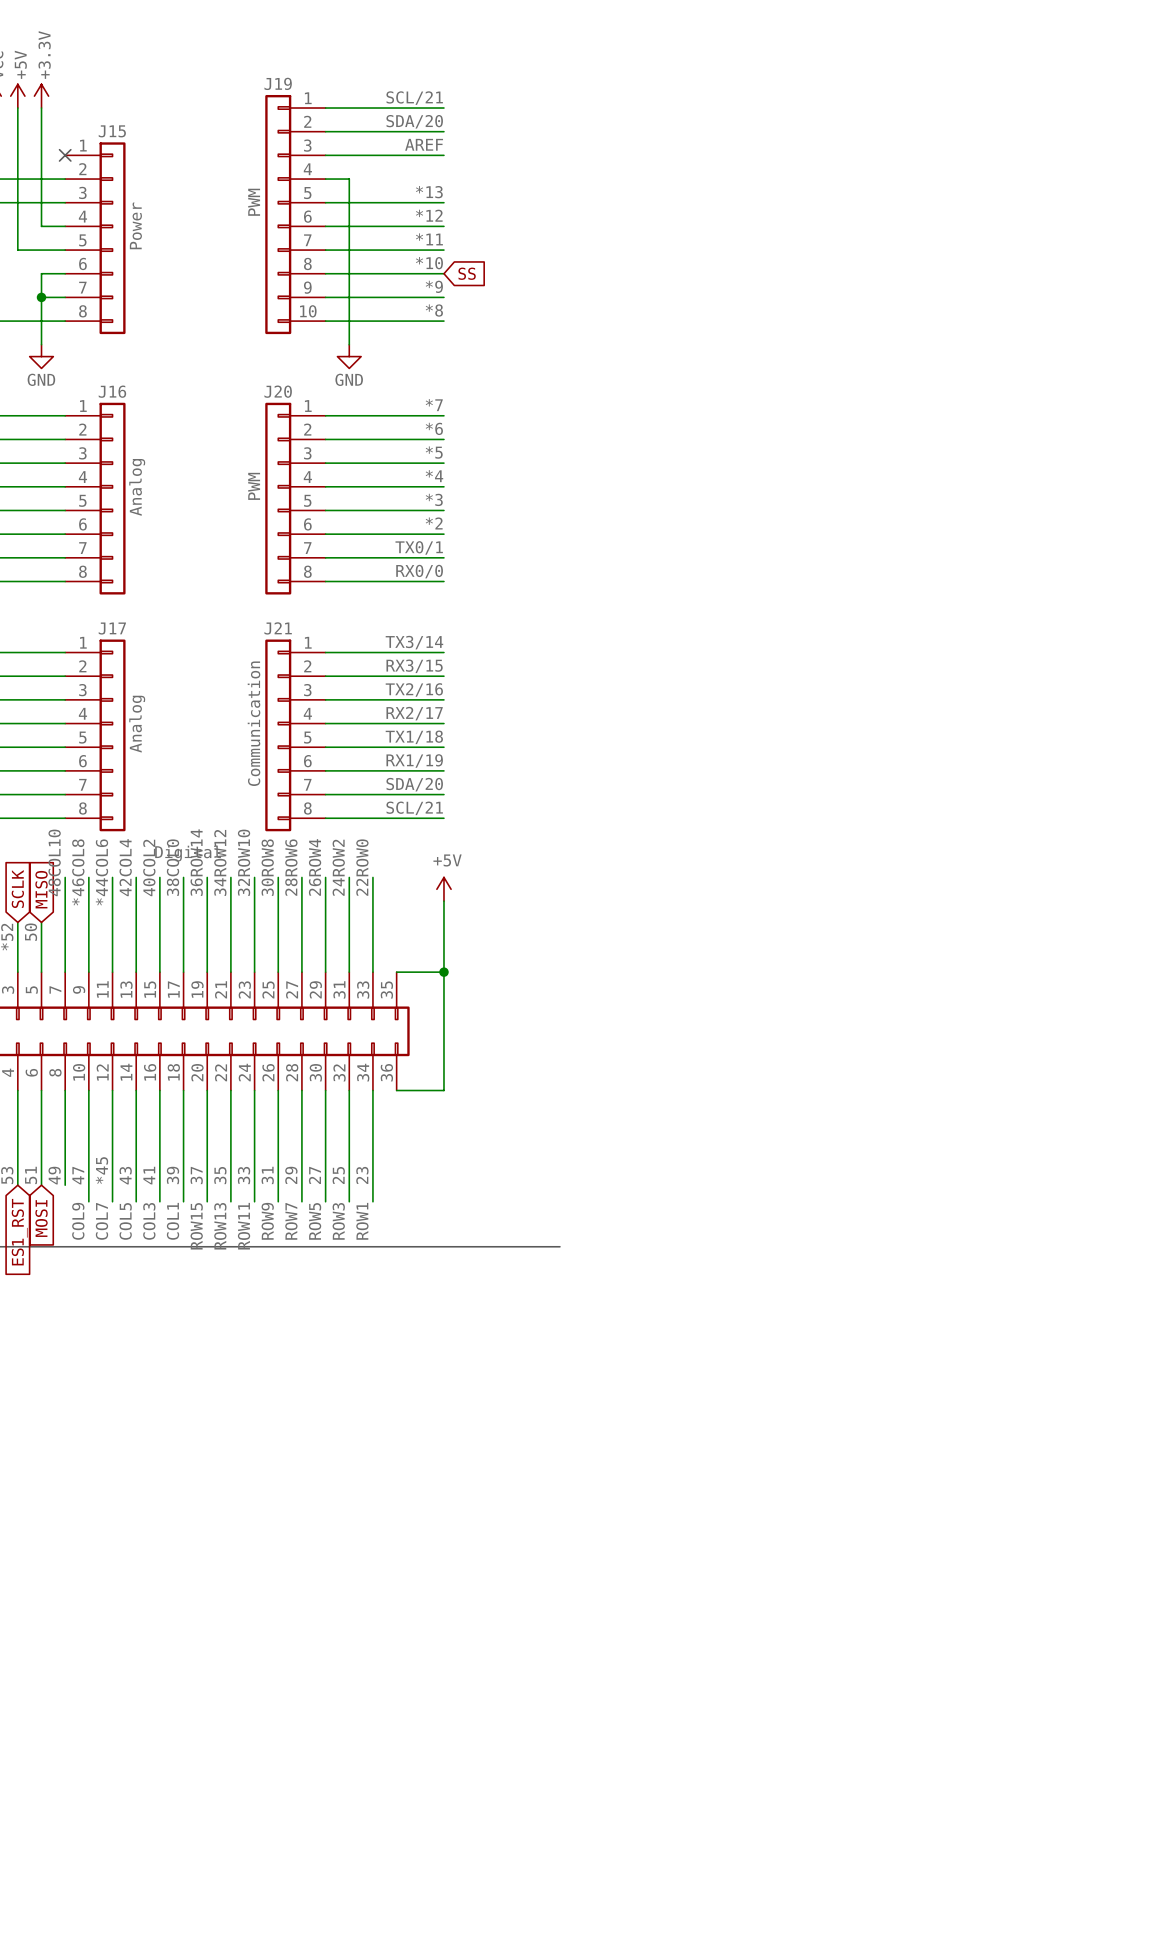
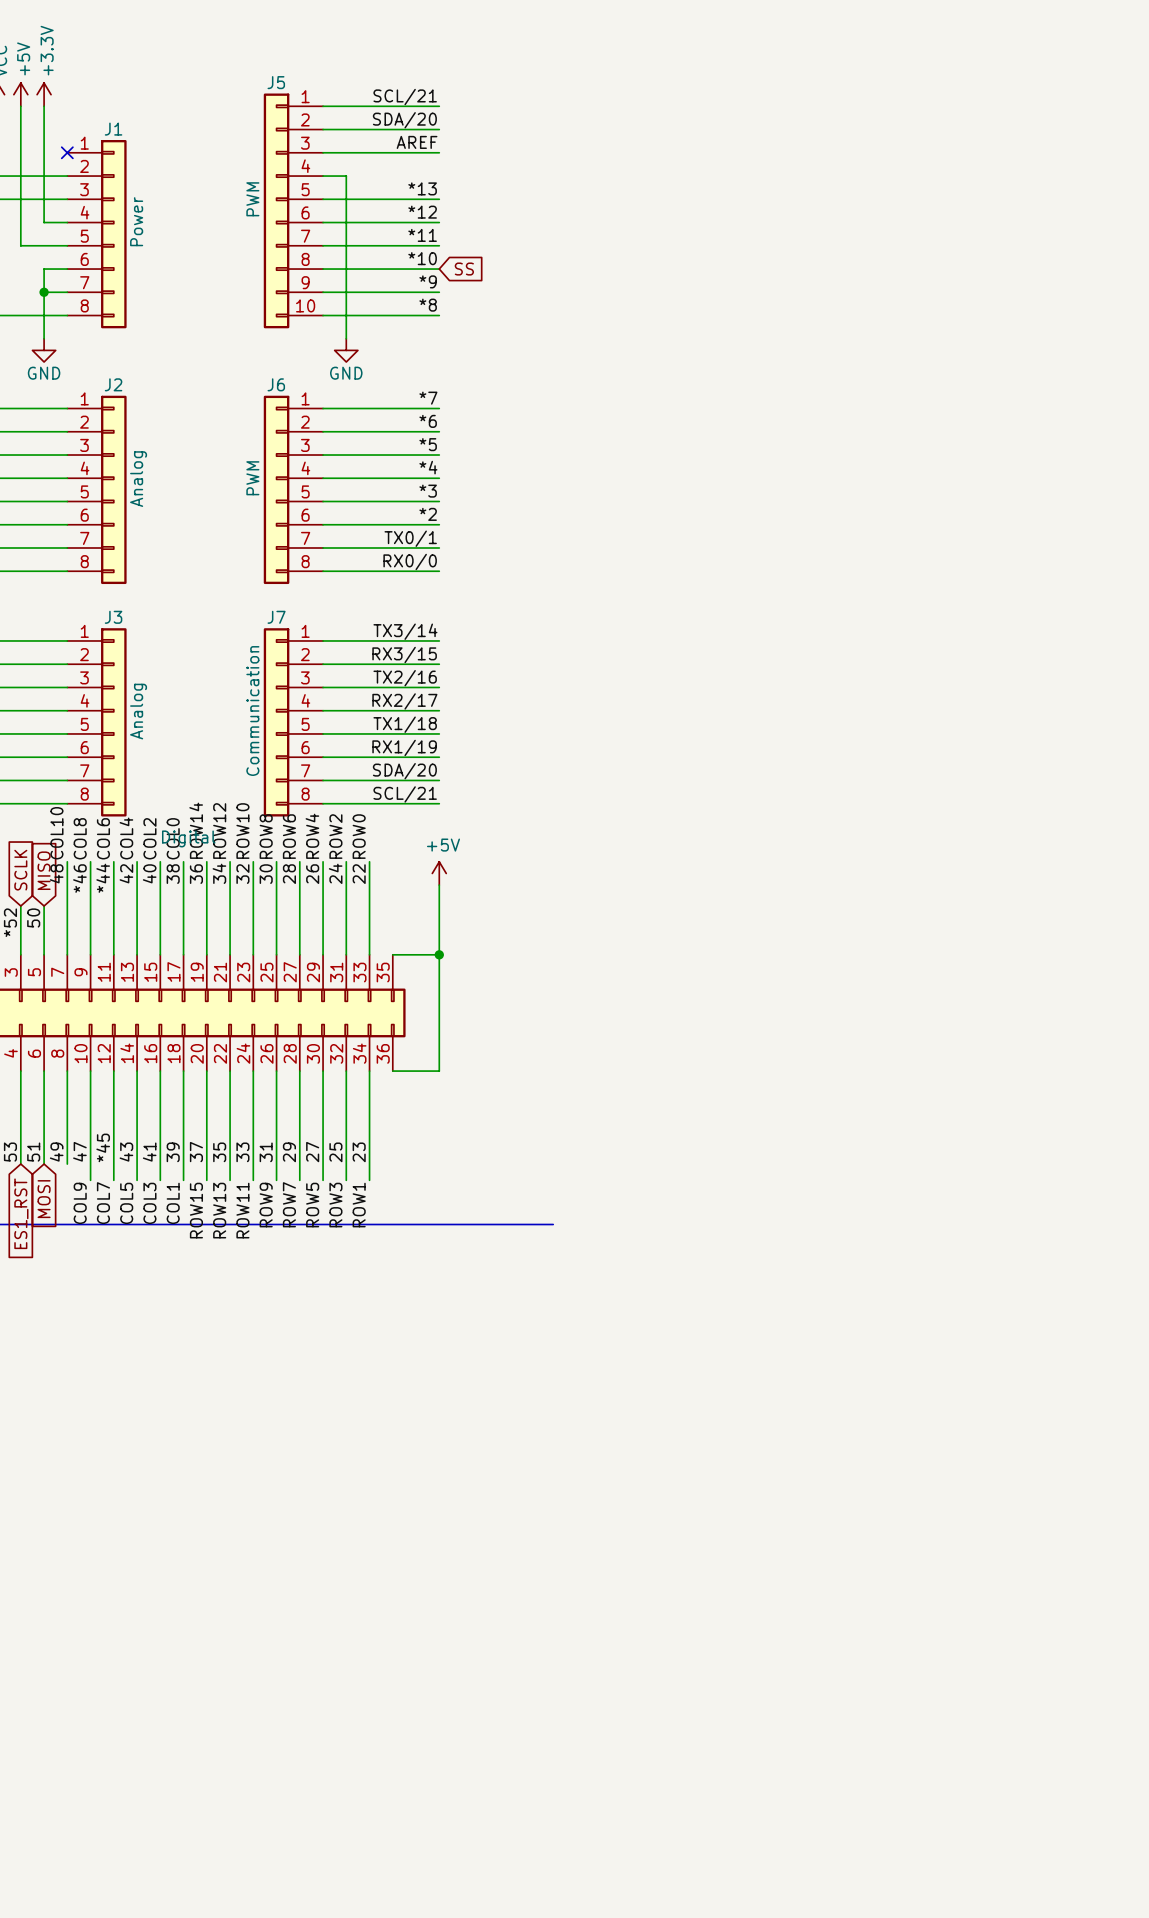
J19 name: J19 (278, 83) -> J5 (276, 82)
J15 name: J15 (112, 131) -> J1 (113, 129)
J16 name: J16 (112, 391) -> J2 (113, 384)
J20 name: J20 (278, 391) -> J6 (276, 384)
J17 name: J17 (112, 628) -> J3 (113, 617)
J21 name: J21 (278, 628) -> J7 (276, 617)

